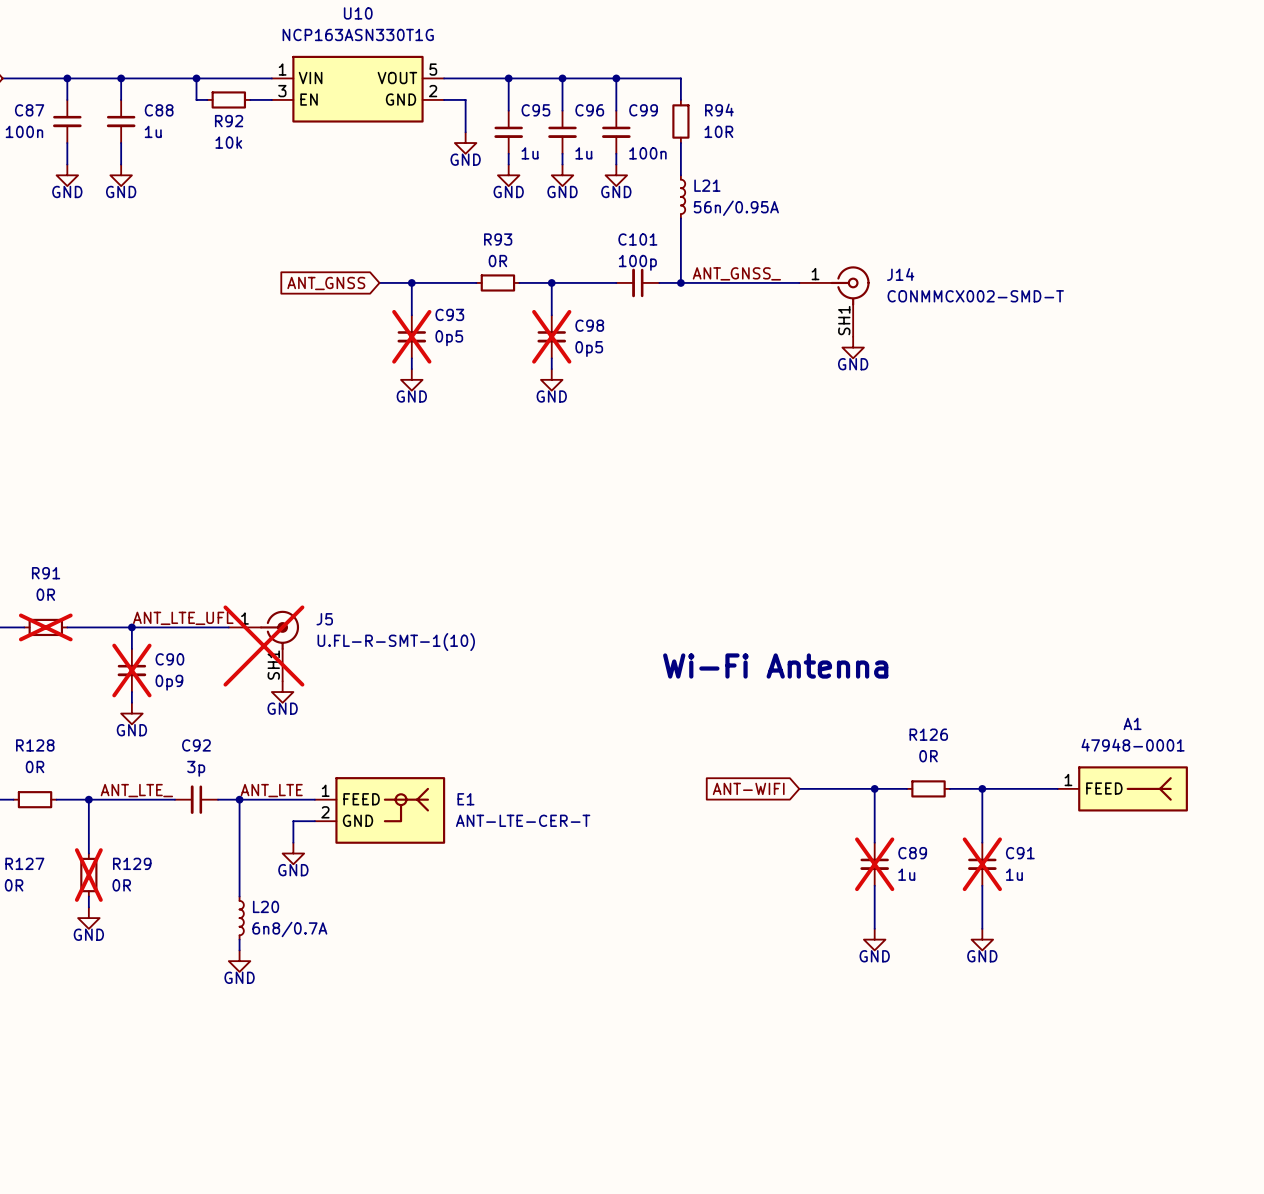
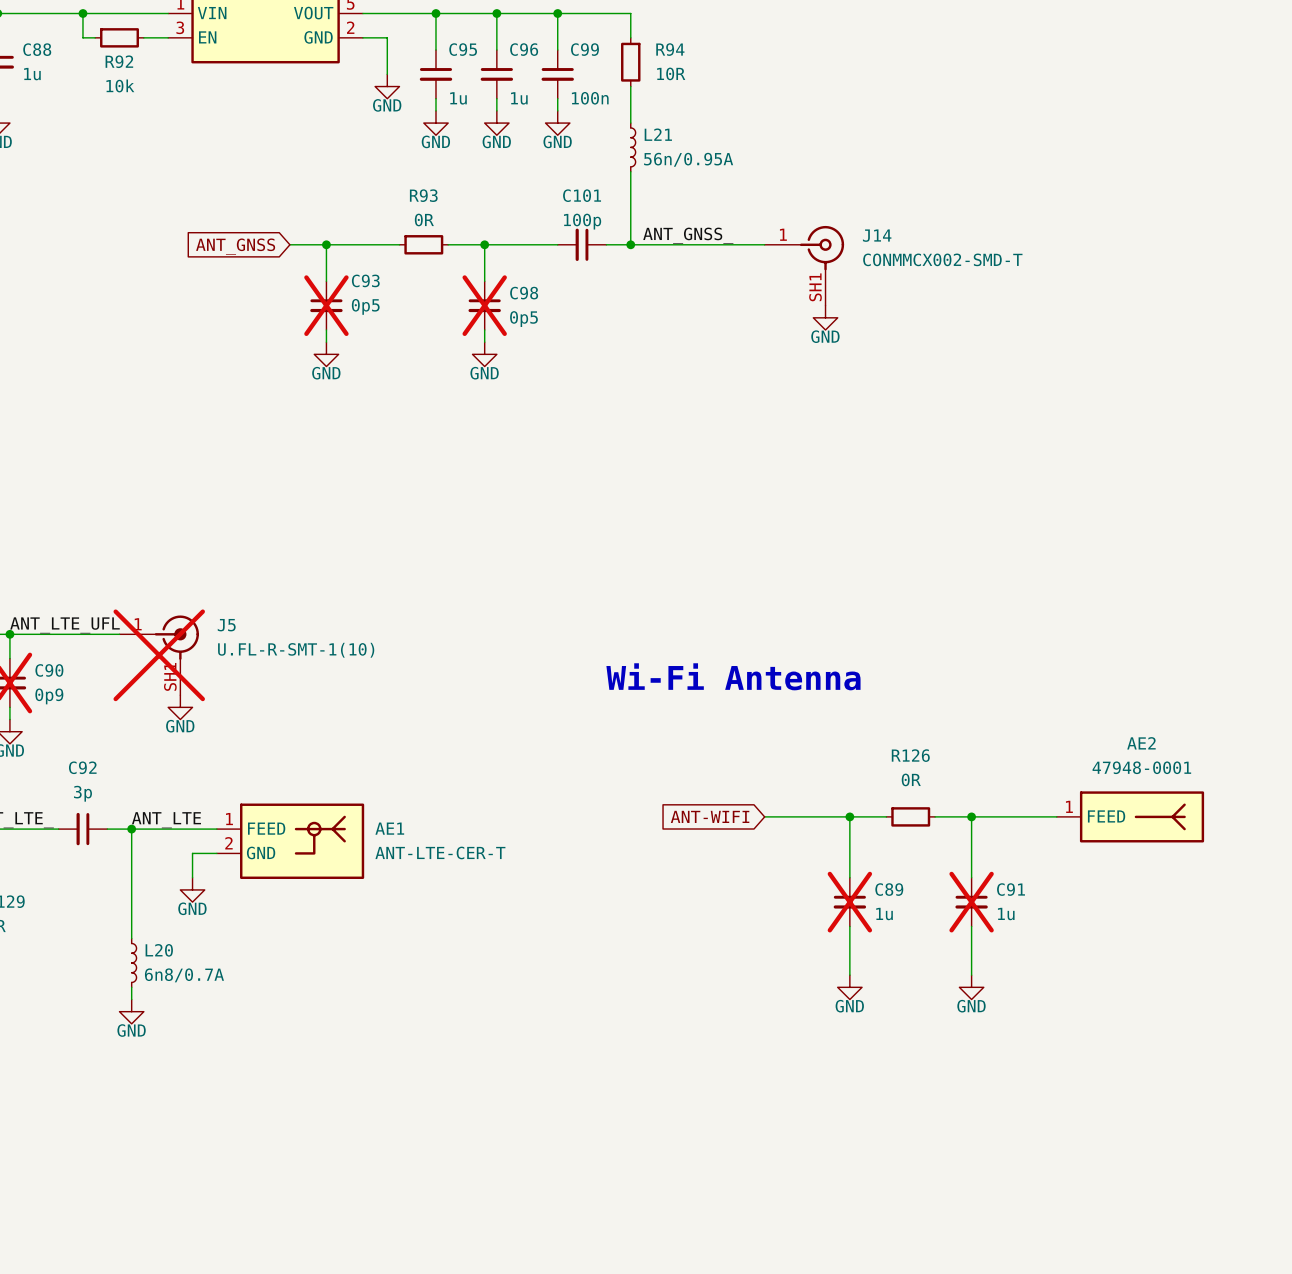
A1 name: A1 (1132, 723) -> AE2 (1141, 743)
E1 name: E1 (465, 799) -> AE1 (389, 828)

